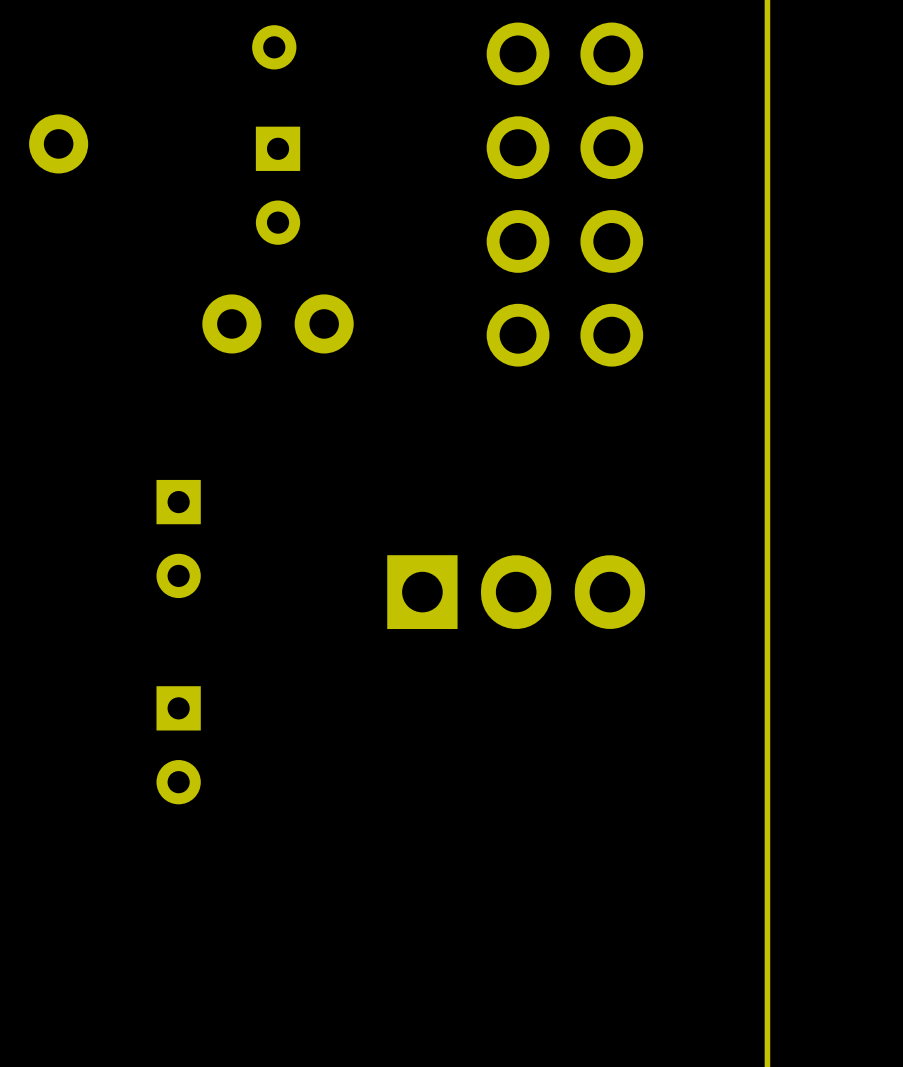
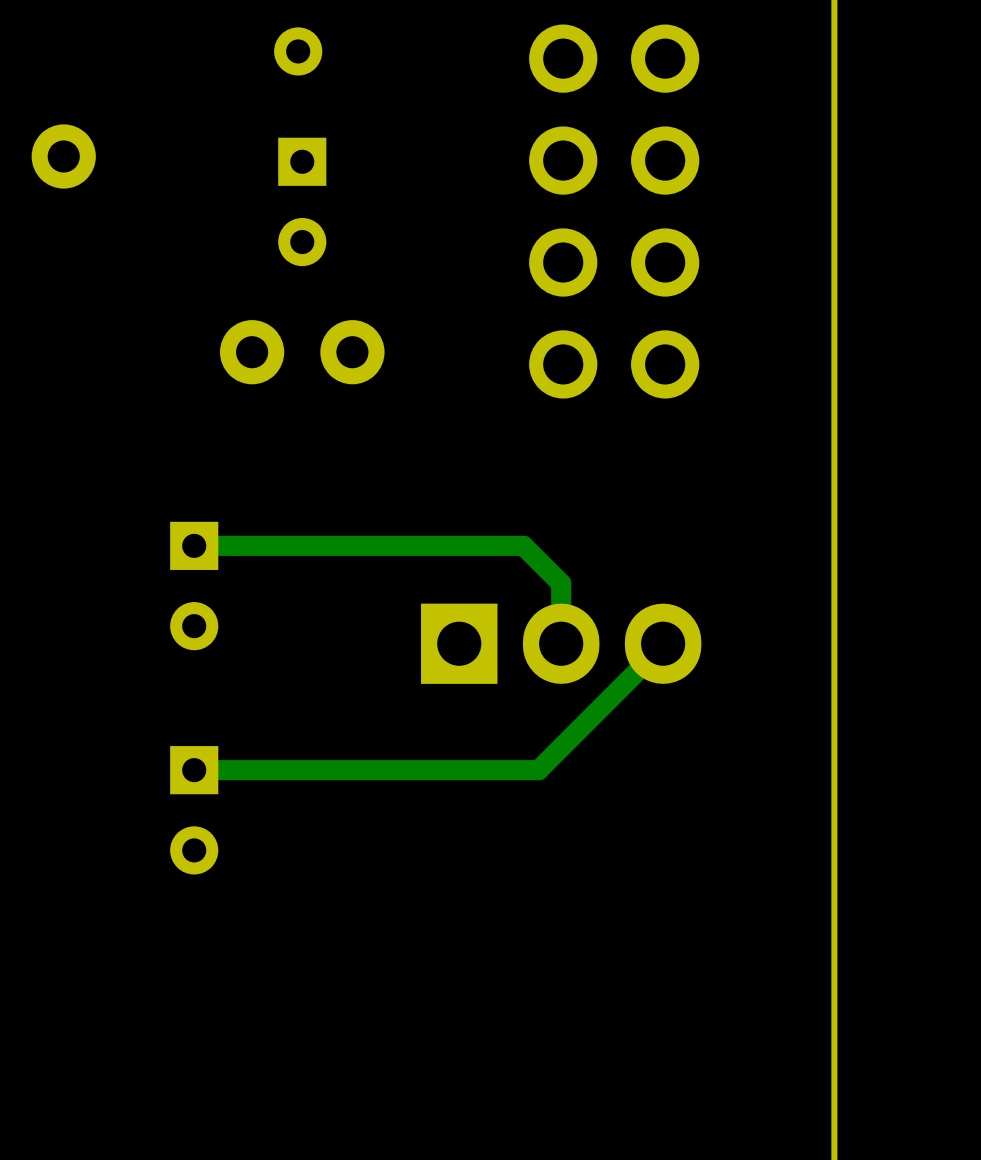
track: none -> (194, 545) (523, 545) (561, 583) (561, 643)
track: none -> (663, 643) (538, 770) (194, 770)

